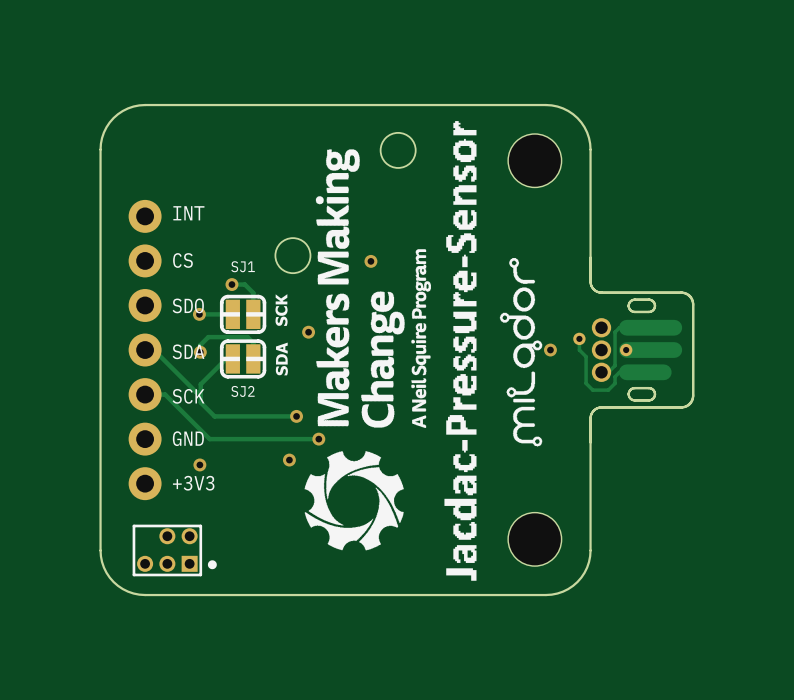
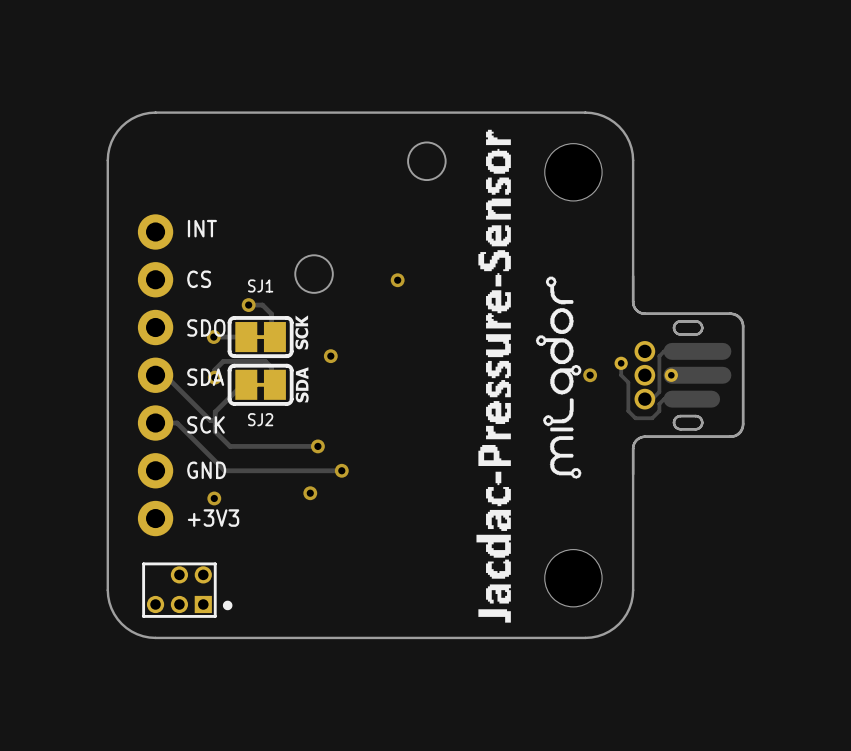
drawing: [304, 149, 431, 551] -> none
SJ1 footprint: [219, 294, 267, 334] -> [227, 316, 294, 359]
SJ2 footprint: [219, 339, 267, 379] -> [227, 363, 294, 406]

